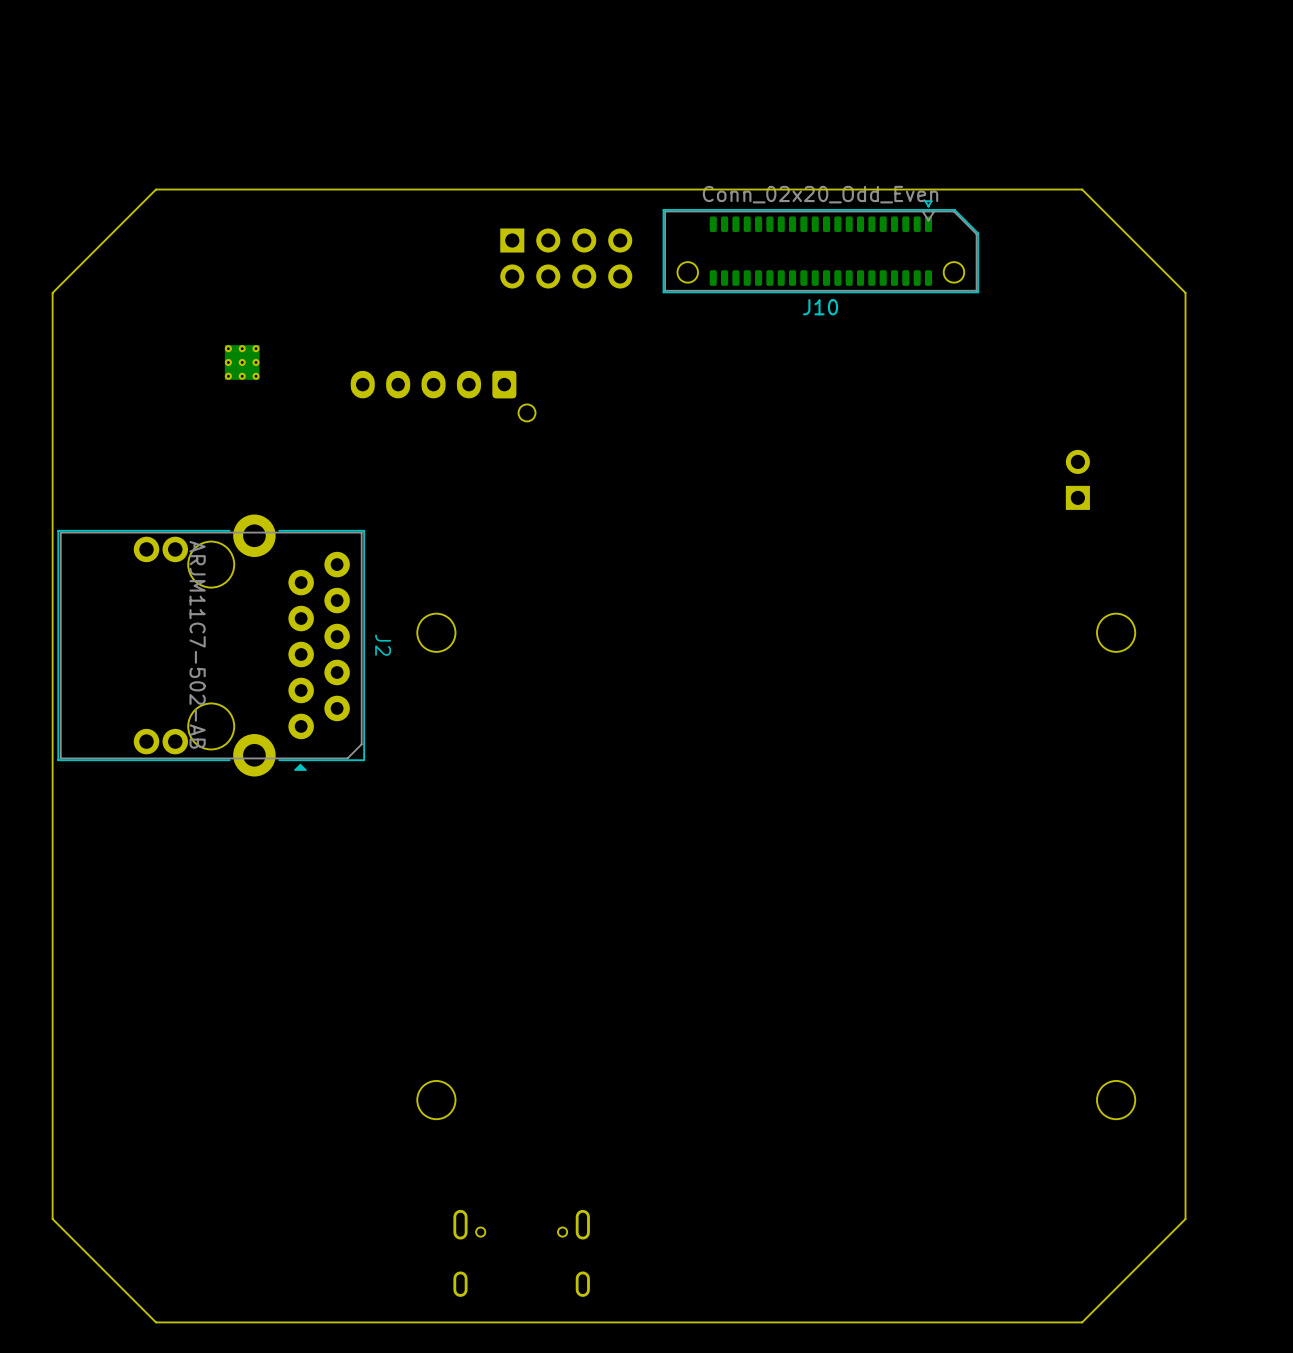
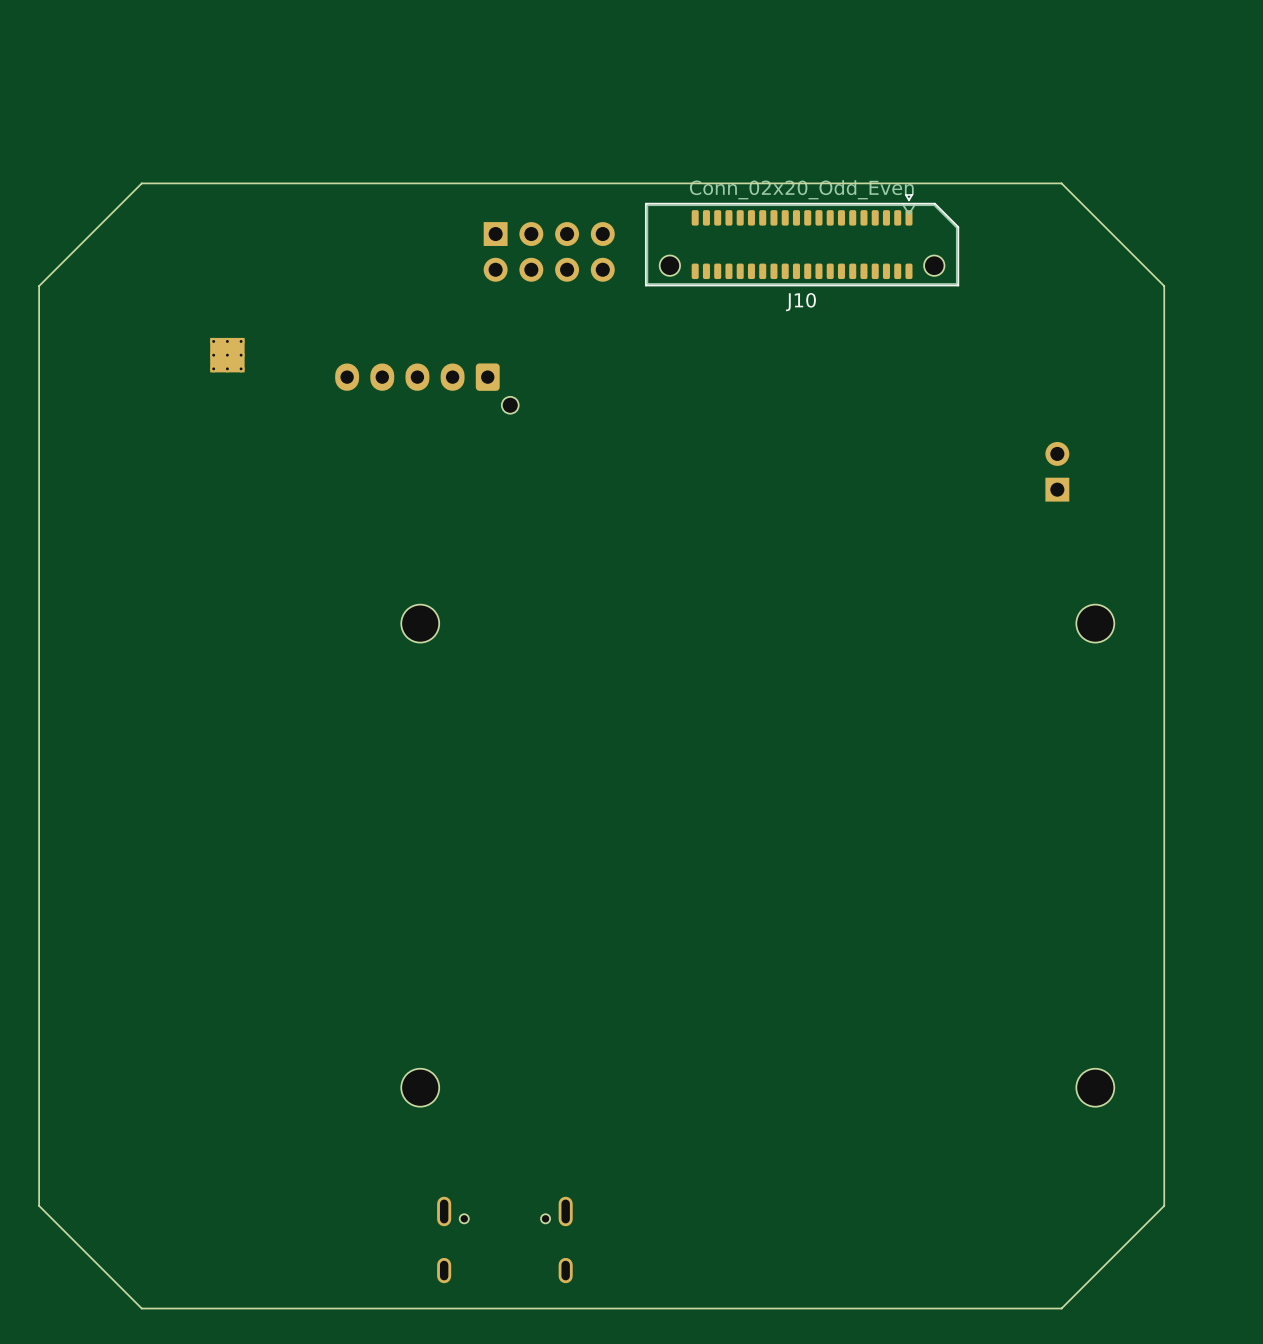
J2: ARJM11C7-502-AB (211, 645) -> none

